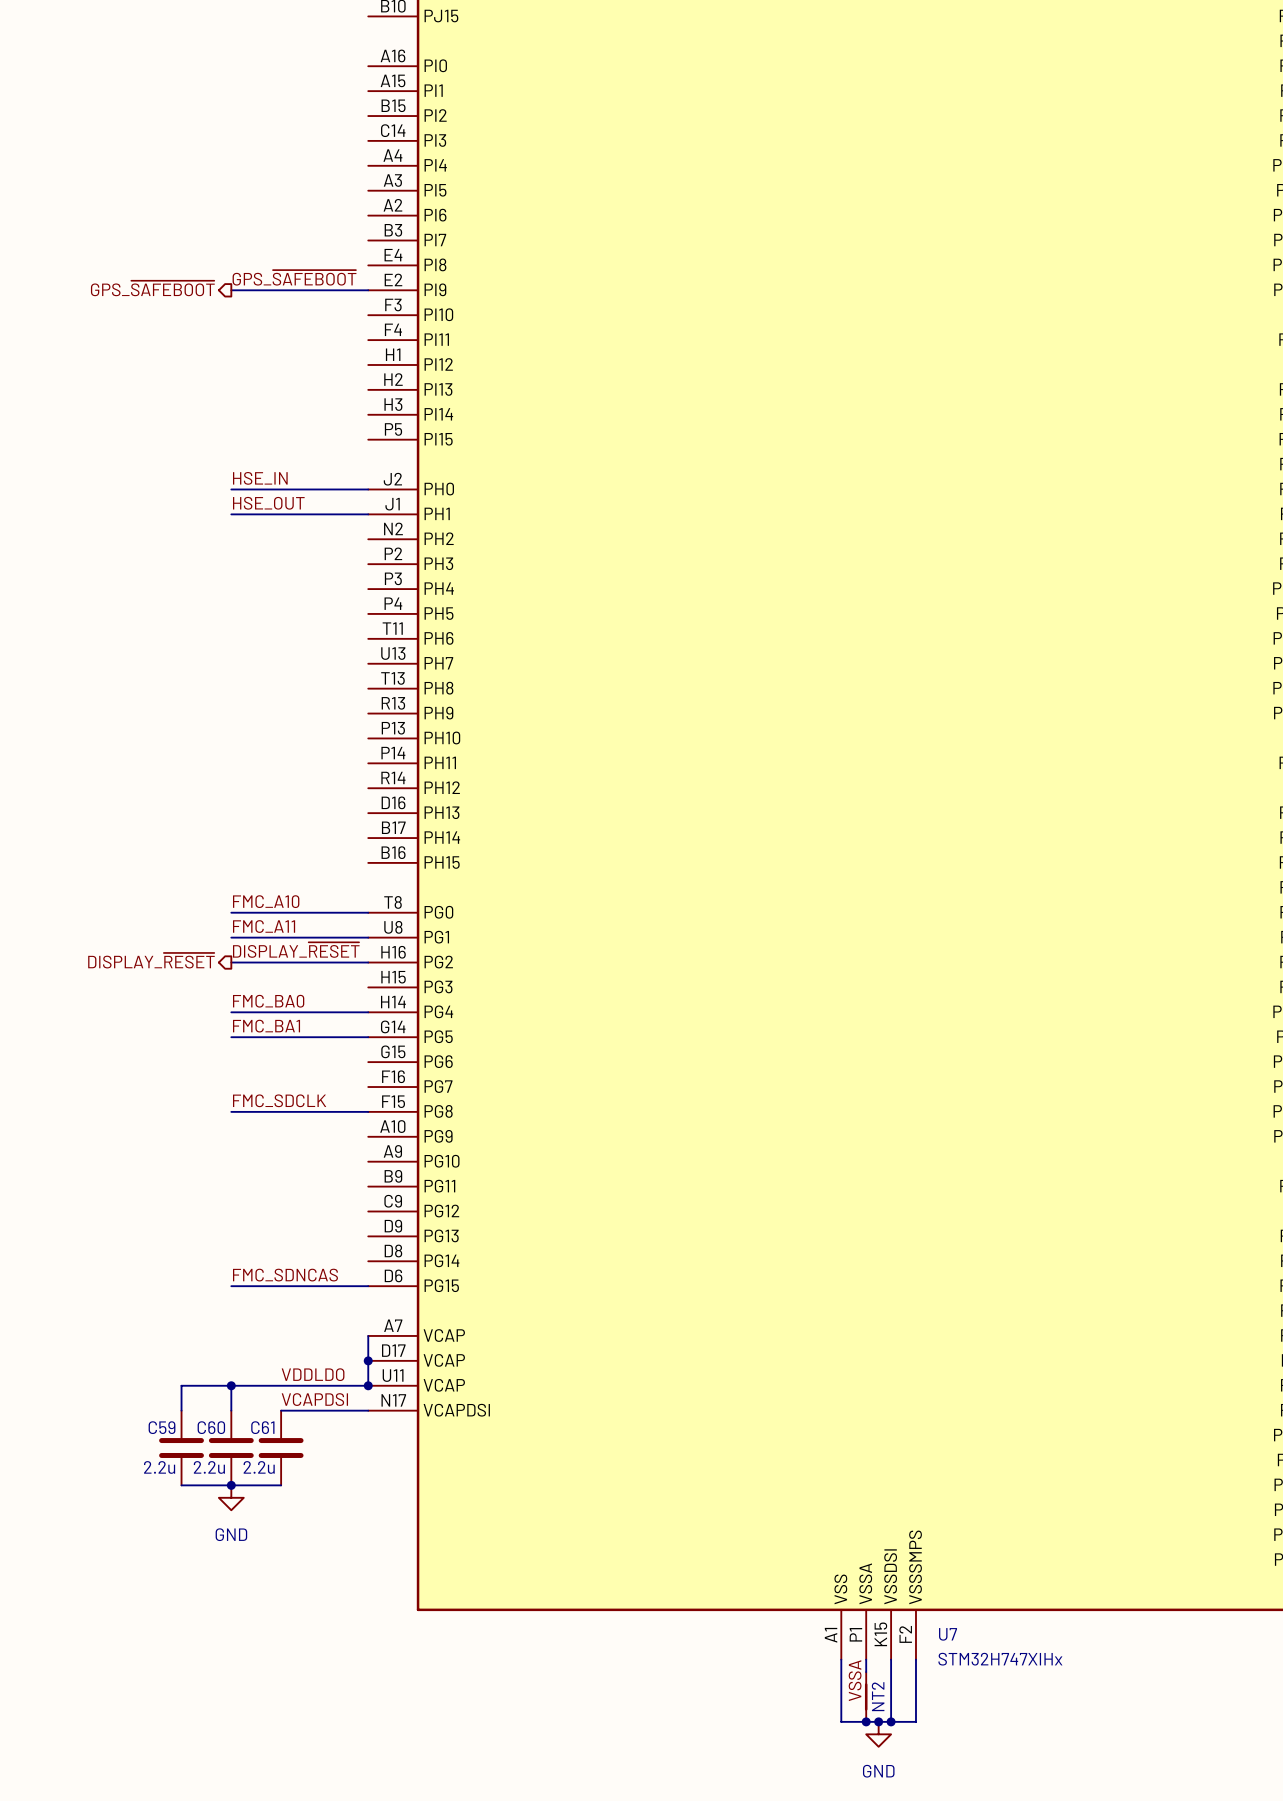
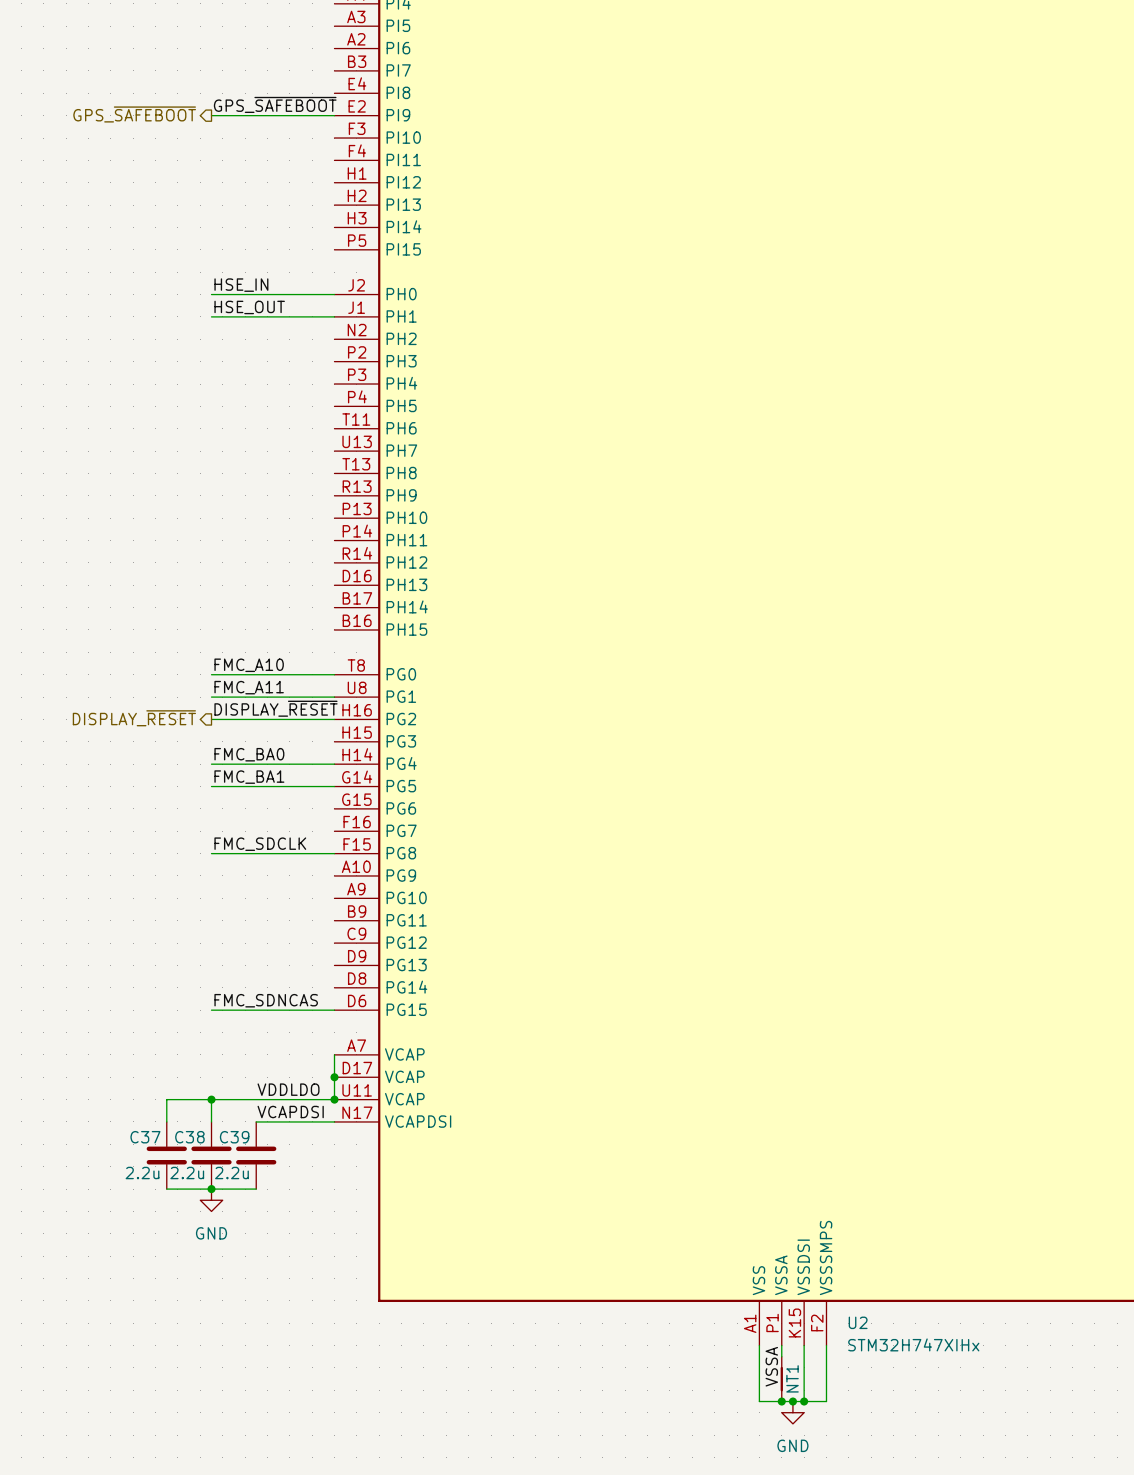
C59 name: C59 (162, 1427) -> C37 (145, 1137)
C60 name: C60 (211, 1427) -> C38 (189, 1137)
C61 name: C61 (262, 1427) -> C39 (234, 1137)
U7 name: U7 (948, 1634) -> U2 (858, 1322)
NT2 name: NT2 (878, 1696) -> NT1 (792, 1378)

